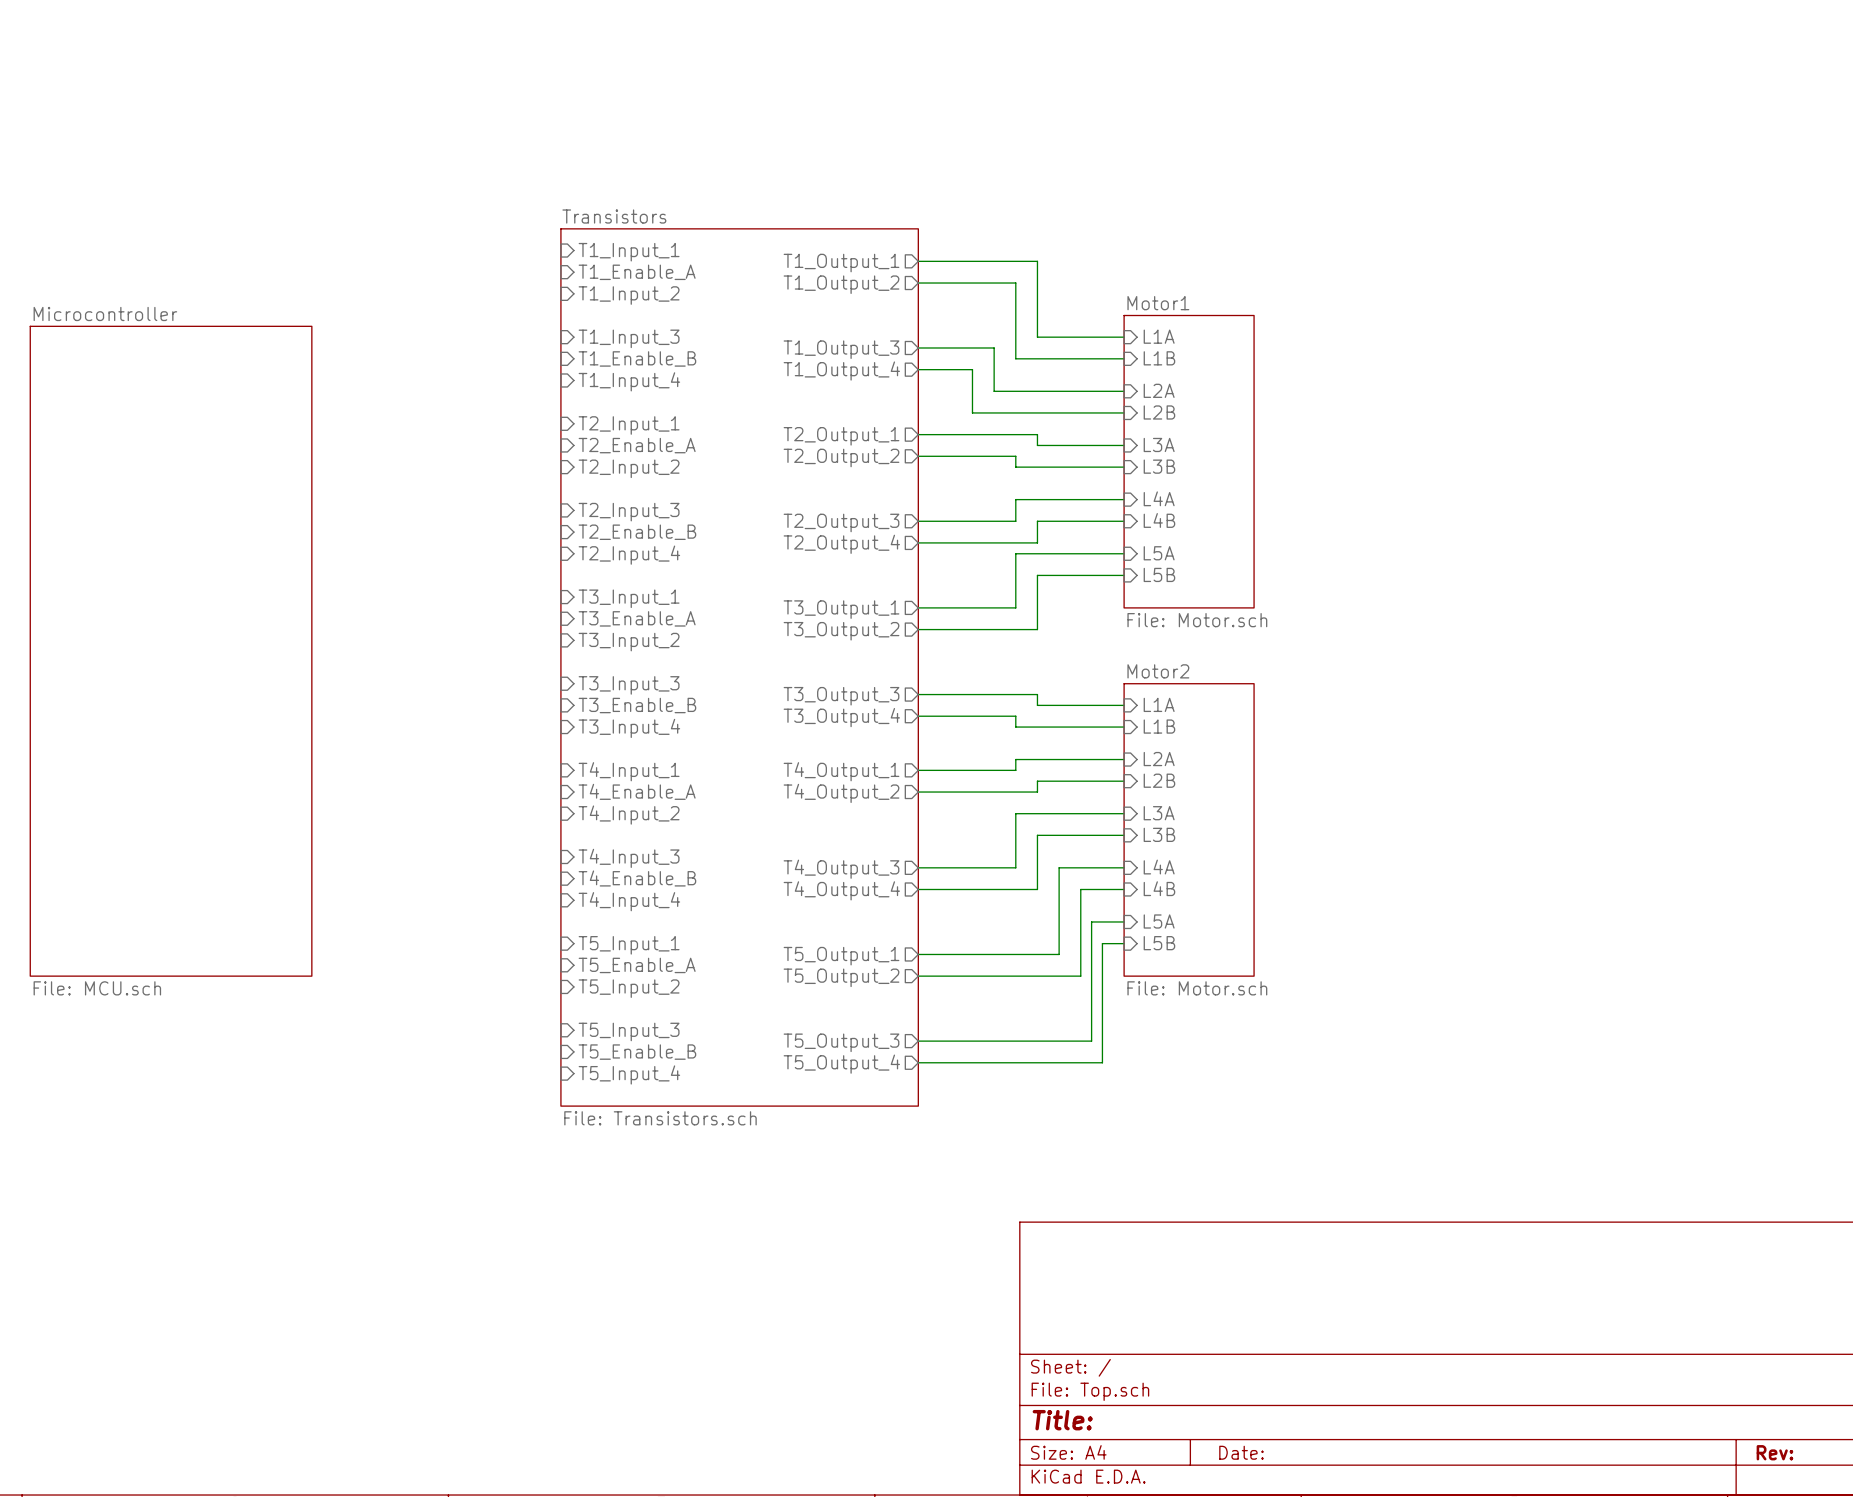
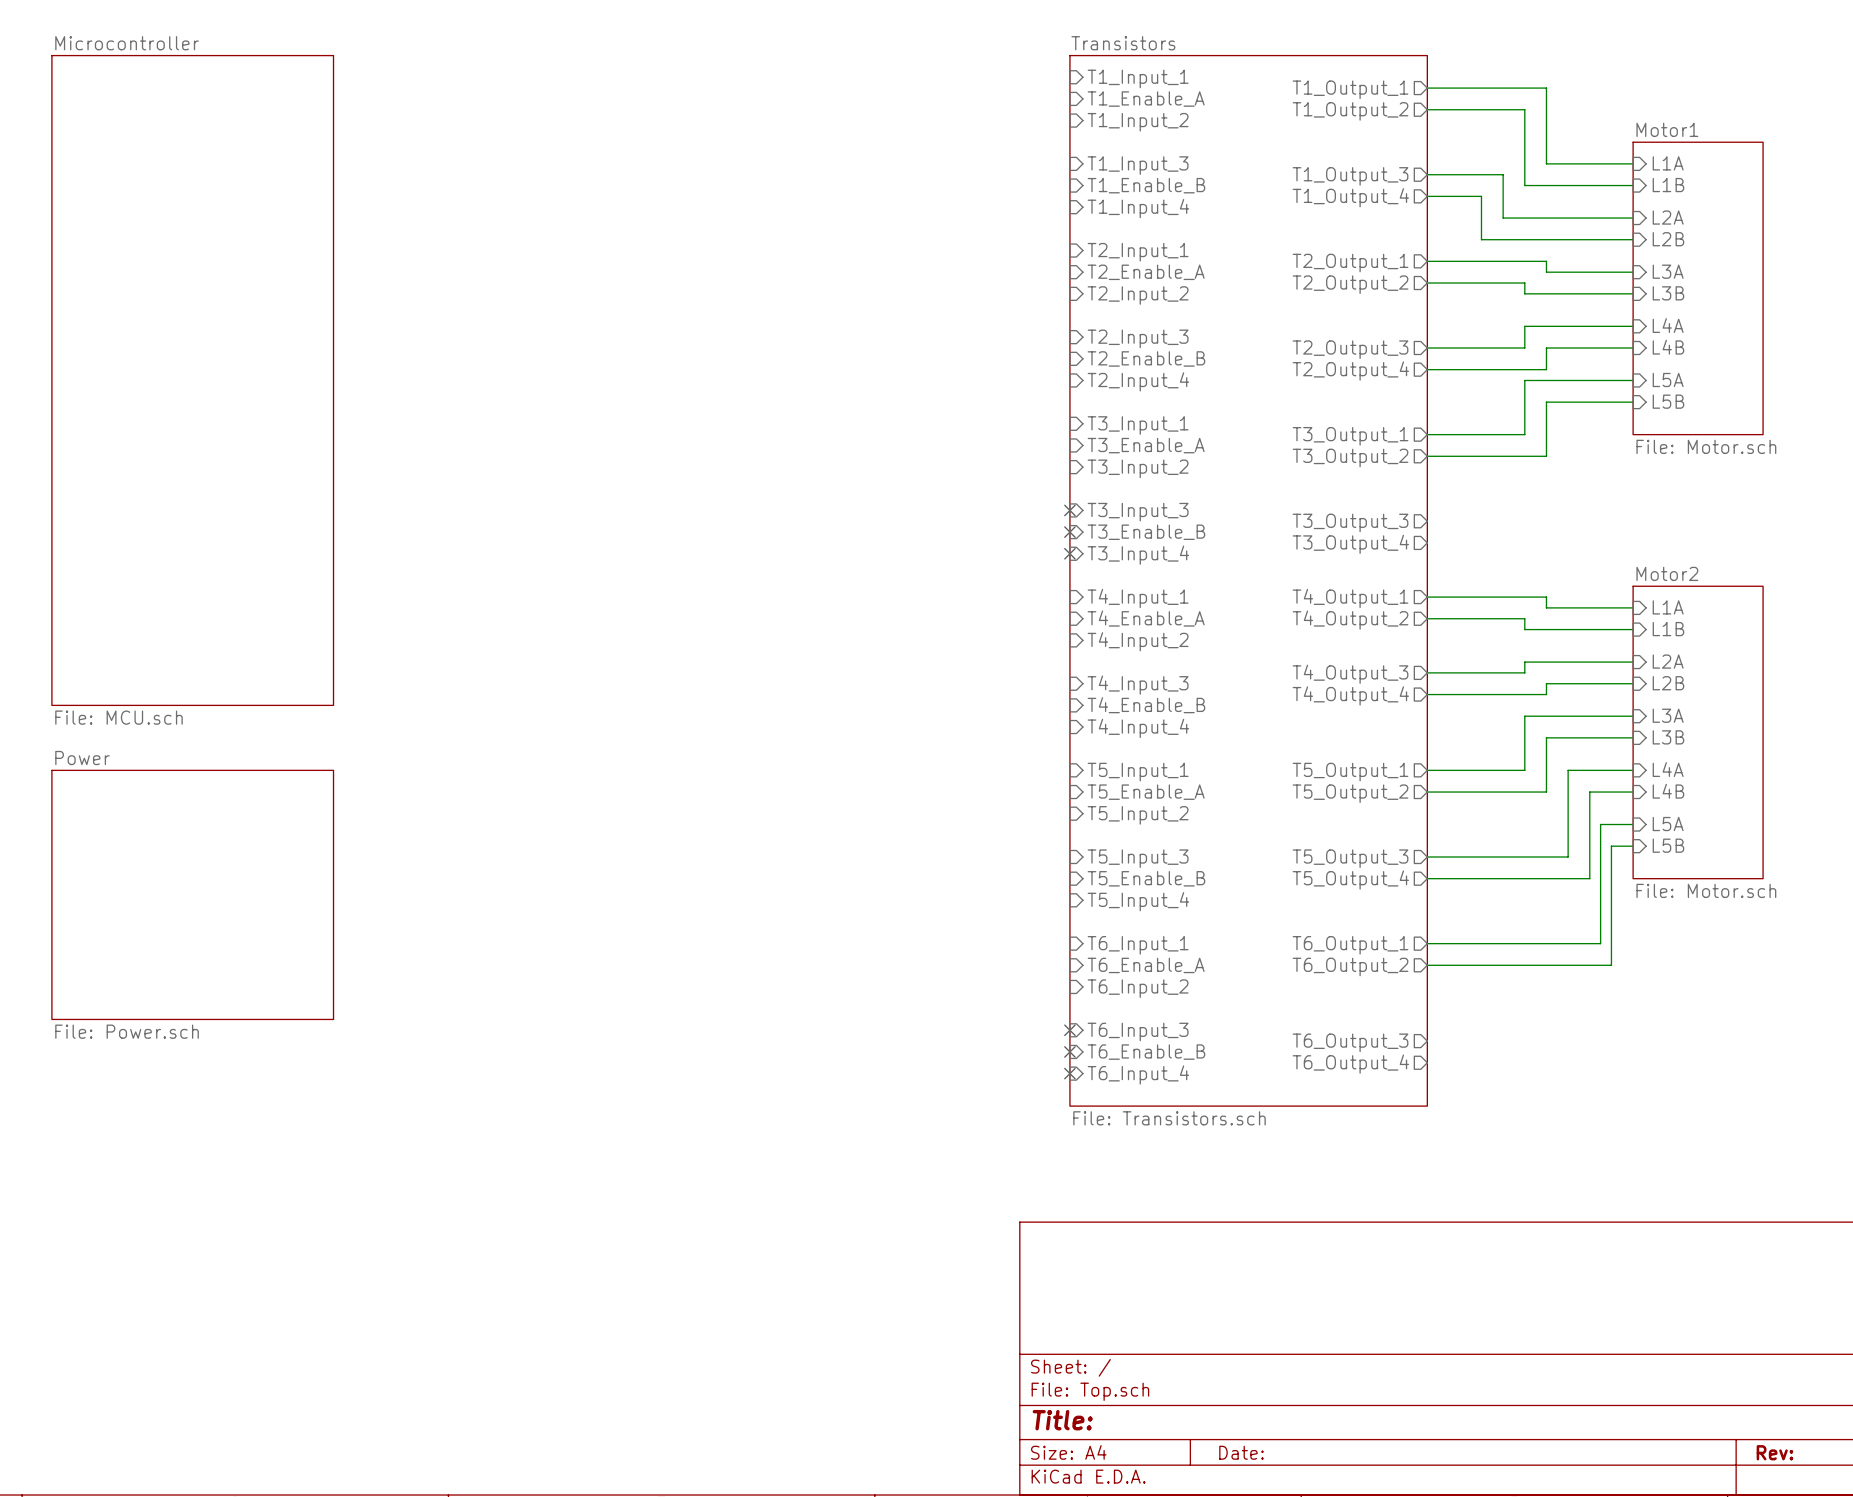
sheet pin: none -> T1_Input_1 (1138, 78)
wire: none -> (1427, 88) (1546, 88) (1546, 163) (1633, 163)
sheet pin: none -> T1_Output_1 (1350, 89)
sheet pin: none -> T1_Enable_A (1146, 99)
wire: none -> (1427, 109) (1524, 109) (1524, 185) (1633, 185)
sheet pin: none -> T1_Output_2 (1350, 111)
sheet pin: none -> T1_Input_2 (1138, 122)
sheet pin: none -> L1A (1668, 163)
sheet pin: none -> T1_Input_3 (1138, 165)
wire: none -> (1427, 174) (1503, 174) (1503, 218) (1633, 218)
sheet pin: none -> T1_Output_3 (1350, 176)
sheet pin: none -> T1_Enable_B (1146, 185)
sheet pin: none -> L1B (1668, 185)
wire: none -> (1427, 196) (1481, 196) (1481, 239) (1633, 239)
sheet pin: none -> T1_Output_4 (1350, 197)
sheet pin: none -> T1_Input_4 (1138, 208)
sheet pin: none -> L2A (1668, 217)
sheet pin: none -> L2B (1668, 239)
sheet pin: T1_Input_1 (629, 252) -> none
sheet pin: none -> T2_Input_1 (1138, 252)
wire: (918, 261) (1037, 261) (1037, 337) (1124, 337) -> none
wire: none -> (1427, 261) (1546, 261) (1546, 272) (1633, 272)
sheet pin: T1_Output_1 (841, 263) -> none
sheet pin: none -> T2_Output_1 (1350, 263)
sheet pin: none -> L3A (1668, 271)
sheet pin: T1_Enable_A (637, 272) -> none
sheet pin: none -> T2_Enable_A (1146, 272)
wire: (918, 283) (1015, 283) (1015, 358) (1124, 358) -> none
wire: none -> (1427, 283) (1524, 283) (1524, 293) (1633, 293)
sheet pin: T1_Output_2 (841, 284) -> none
sheet pin: none -> T2_Output_2 (1350, 284)
sheet pin: none -> L3B (1668, 293)
sheet pin: T1_Input_2 (629, 295) -> none
sheet pin: none -> T2_Input_2 (1138, 295)
sheet pin: none -> L4A (1668, 325)
wire: none -> (1633, 326) (1524, 326) (1524, 347) (1427, 347)
sheet pin: L1A (1159, 336) -> none
sheet pin: T1_Input_3 (629, 338) -> none
sheet pin: none -> T2_Input_3 (1138, 338)
wire: (918, 347) (994, 347) (994, 391) (1124, 391) -> none
wire: none -> (1633, 347) (1546, 347) (1546, 369) (1427, 369)
sheet pin: none -> L4B (1668, 347)
sheet pin: T1_Output_3 (841, 349) -> none
sheet pin: none -> T2_Output_3 (1350, 349)
sheet pin: T1_Enable_B (637, 358) -> none
sheet pin: none -> T2_Enable_B (1146, 358)
sheet pin: L1B (1159, 358) -> none
wire: (918, 369) (972, 369) (972, 412) (1124, 412) -> none
sheet pin: T1_Output_4 (841, 371) -> none
sheet pin: none -> T2_Output_4 (1350, 371)
sheet pin: none -> L5A (1668, 379)
sheet Microcontroller: none -> File: MCU.sch (192, 380)
wire: none -> (1633, 380) (1524, 380) (1524, 434) (1427, 434)
sheet pin: T1_Input_4 (629, 381) -> none
sheet pin: none -> T2_Input_4 (1138, 381)
sheet pin: L2A (1159, 390) -> none
sheet pin: none -> L5B (1668, 401)
wire: none -> (1633, 402) (1546, 402) (1546, 456) (1427, 456)
sheet pin: L2B (1159, 412) -> none
sheet pin: T2_Input_1 (629, 425) -> none
sheet pin: none -> T3_Input_1 (1138, 425)
wire: (918, 434) (1037, 434) (1037, 445) (1124, 445) -> none
sheet pin: T2_Output_1 (841, 436) -> none
sheet pin: none -> T3_Output_1 (1350, 436)
sheet pin: L3A (1159, 444) -> none
sheet pin: T2_Enable_A (637, 445) -> none
sheet pin: none -> T3_Enable_A (1146, 445)
wire: (918, 456) (1015, 456) (1015, 467) (1124, 467) -> none
sheet pin: T2_Output_2 (841, 457) -> none
sheet pin: none -> T3_Output_2 (1350, 457)
sheet Motor1 position: (1189, 461) -> (1698, 288)
sheet pin: L3B (1159, 466) -> none
sheet pin: T2_Input_2 (629, 468) -> none
sheet pin: none -> T3_Input_2 (1138, 468)
sheet pin: L4A (1159, 498) -> none
wire: (1124, 499) (1015, 499) (1015, 521) (918, 521) -> none
no-connect mark: none -> (1069, 510)
sheet pin: T2_Input_3 (629, 512) -> none
sheet pin: none -> T3_Input_3 (1138, 512)
sheet pin: L4B (1159, 520) -> none
wire: (1124, 521) (1037, 521) (1037, 542) (918, 542) -> none
sheet pin: T2_Output_3 (841, 522) -> none
sheet pin: none -> T3_Output_3 (1350, 522)
sheet pin: T2_Enable_B (637, 532) -> none
no-connect mark: none -> (1069, 532)
sheet pin: none -> T3_Enable_B (1146, 532)
sheet pin: T2_Output_4 (841, 544) -> none
sheet pin: none -> T3_Output_4 (1350, 544)
no-connect mark: none -> (1069, 553)
wire: (1124, 553) (1015, 553) (1015, 607) (918, 607) -> none
sheet pin: L5A (1159, 553) -> none
sheet pin: T2_Input_4 (629, 555) -> none
sheet pin: none -> T3_Input_4 (1138, 555)
sheet pin: L5B (1159, 574) -> none
wire: (1124, 575) (1037, 575) (1037, 629) (918, 629) -> none
sheet Transistors: none -> File: Transistors.sch (1248, 580)
wire: none -> (1427, 597) (1546, 597) (1546, 607) (1633, 607)
sheet pin: T3_Input_1 (629, 598) -> none
sheet pin: none -> T4_Input_1 (1138, 598)
sheet pin: none -> T4_Output_1 (1350, 598)
sheet pin: none -> L1A (1668, 607)
sheet pin: T3_Output_1 (841, 609) -> none
sheet pin: T3_Enable_A (637, 618) -> none
sheet pin: none -> T4_Enable_A (1146, 618)
wire: none -> (1427, 618) (1524, 618) (1524, 629) (1633, 629)
sheet pin: none -> T4_Output_2 (1350, 620)
sheet pin: none -> L1B (1668, 629)
sheet pin: T3_Output_2 (841, 631) -> none
sheet pin: none -> T4_Input_2 (1138, 641)
sheet pin: T3_Input_2 (629, 642) -> none
sheet Microcontroller: File: MCU.sch (171, 651) -> none
sheet pin: none -> L2A (1668, 661)
wire: none -> (1633, 662) (1524, 662) (1524, 672) (1427, 672)
sheet Transistors: File: Transistors.sch (739, 667) -> none
sheet pin: none -> T4_Output_3 (1350, 674)
wire: none -> (1633, 683) (1546, 683) (1546, 694) (1427, 694)
sheet pin: none -> L2B (1668, 683)
sheet pin: T3_Input_3 (629, 685) -> none
sheet pin: none -> T4_Input_3 (1138, 685)
wire: (918, 694) (1037, 694) (1037, 705) (1124, 705) -> none
sheet pin: none -> T4_Output_4 (1350, 695)
sheet pin: T3_Output_3 (841, 696) -> none
sheet pin: L1A (1159, 704) -> none
sheet pin: T3_Enable_B (637, 705) -> none
sheet pin: none -> T4_Enable_B (1146, 705)
sheet pin: none -> L3A (1668, 715)
wire: (918, 716) (1015, 716) (1015, 727) (1124, 727) -> none
wire: none -> (1633, 716) (1524, 716) (1524, 770) (1427, 770)
sheet pin: T3_Output_4 (841, 717) -> none
sheet pin: L1B (1159, 726) -> none
sheet pin: T3_Input_4 (629, 728) -> none
sheet pin: none -> T4_Input_4 (1138, 728)
wire: none -> (1633, 737) (1546, 737) (1546, 792) (1427, 792)
sheet pin: none -> L3B (1668, 737)
wire: (1124, 759) (1015, 759) (1015, 770) (918, 770) -> none
sheet pin: L2A (1159, 759) -> none
sheet pin: none -> L4A (1668, 769)
wire: none -> (1633, 770) (1568, 770) (1568, 857) (1427, 857)
sheet pin: T4_Input_1 (629, 771) -> none
sheet pin: T4_Output_1 (841, 771) -> none
sheet pin: none -> T5_Input_1 (1138, 772)
sheet pin: none -> T5_Output_1 (1350, 772)
sheet pin: L2B (1159, 780) -> none
wire: (1124, 781) (1037, 781) (1037, 792) (918, 792) -> none
sheet pin: T4_Enable_A (637, 791) -> none
sheet pin: none -> L4B (1668, 791)
sheet pin: none -> T5_Enable_A (1146, 792)
wire: none -> (1633, 792) (1589, 792) (1589, 878) (1427, 878)
sheet pin: T4_Output_2 (841, 793) -> none
sheet pin: none -> T5_Output_2 (1350, 793)
wire: (1124, 813) (1015, 813) (1015, 867) (918, 867) -> none
sheet pin: L3A (1159, 813) -> none
sheet pin: T4_Input_2 (629, 815) -> none
sheet pin: none -> T5_Input_2 (1138, 815)
wire: none -> (1633, 824) (1600, 824) (1600, 943) (1427, 943)
sheet pin: none -> L5A (1668, 824)
sheet Motor2 position: (1189, 829) -> (1698, 732)
sheet pin: L3B (1159, 834) -> none
wire: (1124, 835) (1037, 835) (1037, 889) (918, 889) -> none
sheet pin: none -> L5B (1668, 845)
wire: none -> (1633, 846) (1611, 846) (1611, 965) (1427, 965)
sheet pin: T4_Input_3 (629, 858) -> none
sheet pin: none -> T5_Input_3 (1138, 858)
sheet pin: none -> T5_Output_3 (1350, 858)
wire: (1124, 867) (1059, 867) (1059, 954) (918, 954) -> none
sheet pin: L4A (1159, 867) -> none
sheet pin: T4_Output_3 (841, 869) -> none
sheet pin: T4_Enable_B (637, 878) -> none
sheet pin: none -> T5_Enable_B (1146, 878)
sheet pin: none -> T5_Output_4 (1350, 880)
sheet pin: L4B (1159, 888) -> none
wire: (1124, 889) (1080, 889) (1080, 976) (918, 976) -> none
sheet pin: T4_Output_4 (841, 890) -> none
sheet Power: none -> File: Power.sch (192, 894)
sheet pin: T4_Input_4 (629, 901) -> none
sheet pin: none -> T5_Input_4 (1138, 901)
wire: (1124, 921) (1091, 921) (1091, 1041) (918, 1041) -> none
sheet pin: L5A (1159, 921) -> none
wire: (1124, 943) (1102, 943) (1102, 1062) (918, 1062) -> none
sheet pin: L5B (1159, 943) -> none
sheet pin: T5_Input_1 (629, 945) -> none
sheet pin: none -> T6_Input_1 (1138, 945)
sheet pin: none -> T6_Output_1 (1350, 945)
sheet pin: T5_Output_1 (841, 956) -> none
sheet pin: T5_Enable_A (637, 965) -> none
sheet pin: none -> T6_Enable_A (1146, 965)
sheet pin: none -> T6_Output_2 (1350, 966)
sheet pin: T5_Output_2 (841, 977) -> none
sheet pin: T5_Input_2 (629, 988) -> none
sheet pin: none -> T6_Input_2 (1138, 988)
no-connect mark: none -> (1069, 1030)
sheet pin: T5_Input_3 (629, 1031) -> none
sheet pin: none -> T6_Input_3 (1138, 1031)
sheet pin: T5_Output_3 (841, 1042) -> none
sheet pin: none -> T6_Output_3 (1350, 1042)
no-connect mark: none -> (1069, 1051)
sheet pin: T5_Enable_B (637, 1052) -> none
sheet pin: none -> T6_Enable_B (1146, 1052)
sheet pin: T5_Output_4 (841, 1064) -> none
sheet pin: none -> T6_Output_4 (1350, 1064)
no-connect mark: none -> (1069, 1073)
sheet pin: T5_Input_4 (629, 1074) -> none
sheet pin: none -> T6_Input_4 (1138, 1074)

